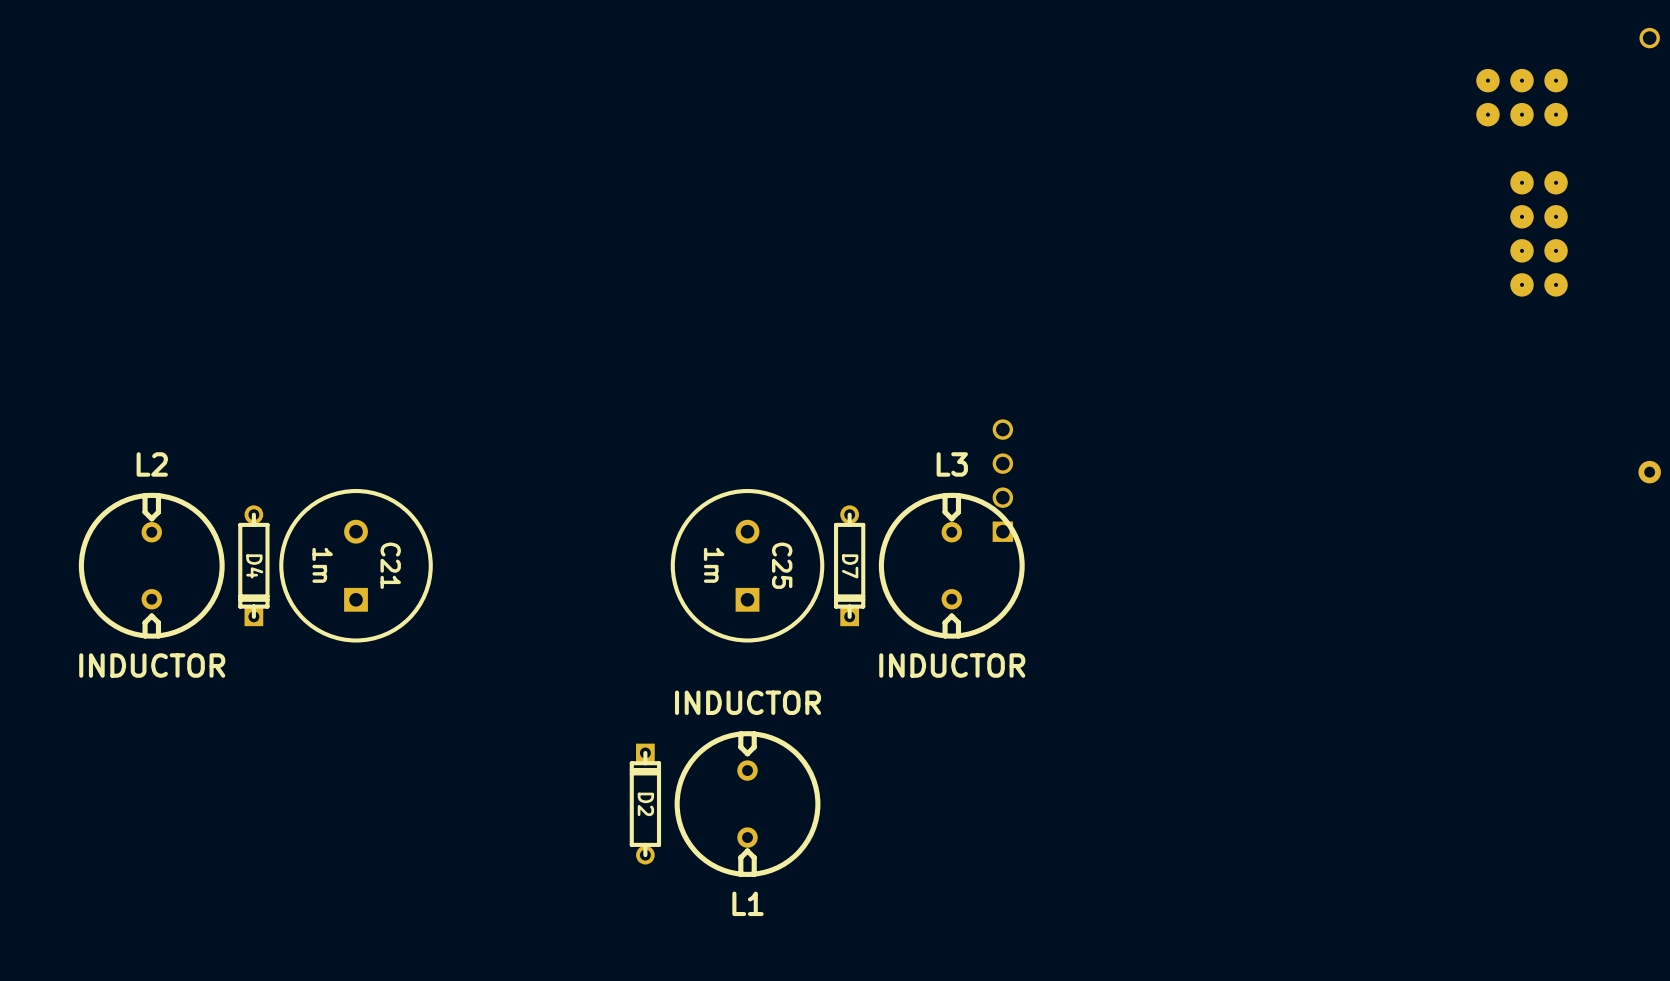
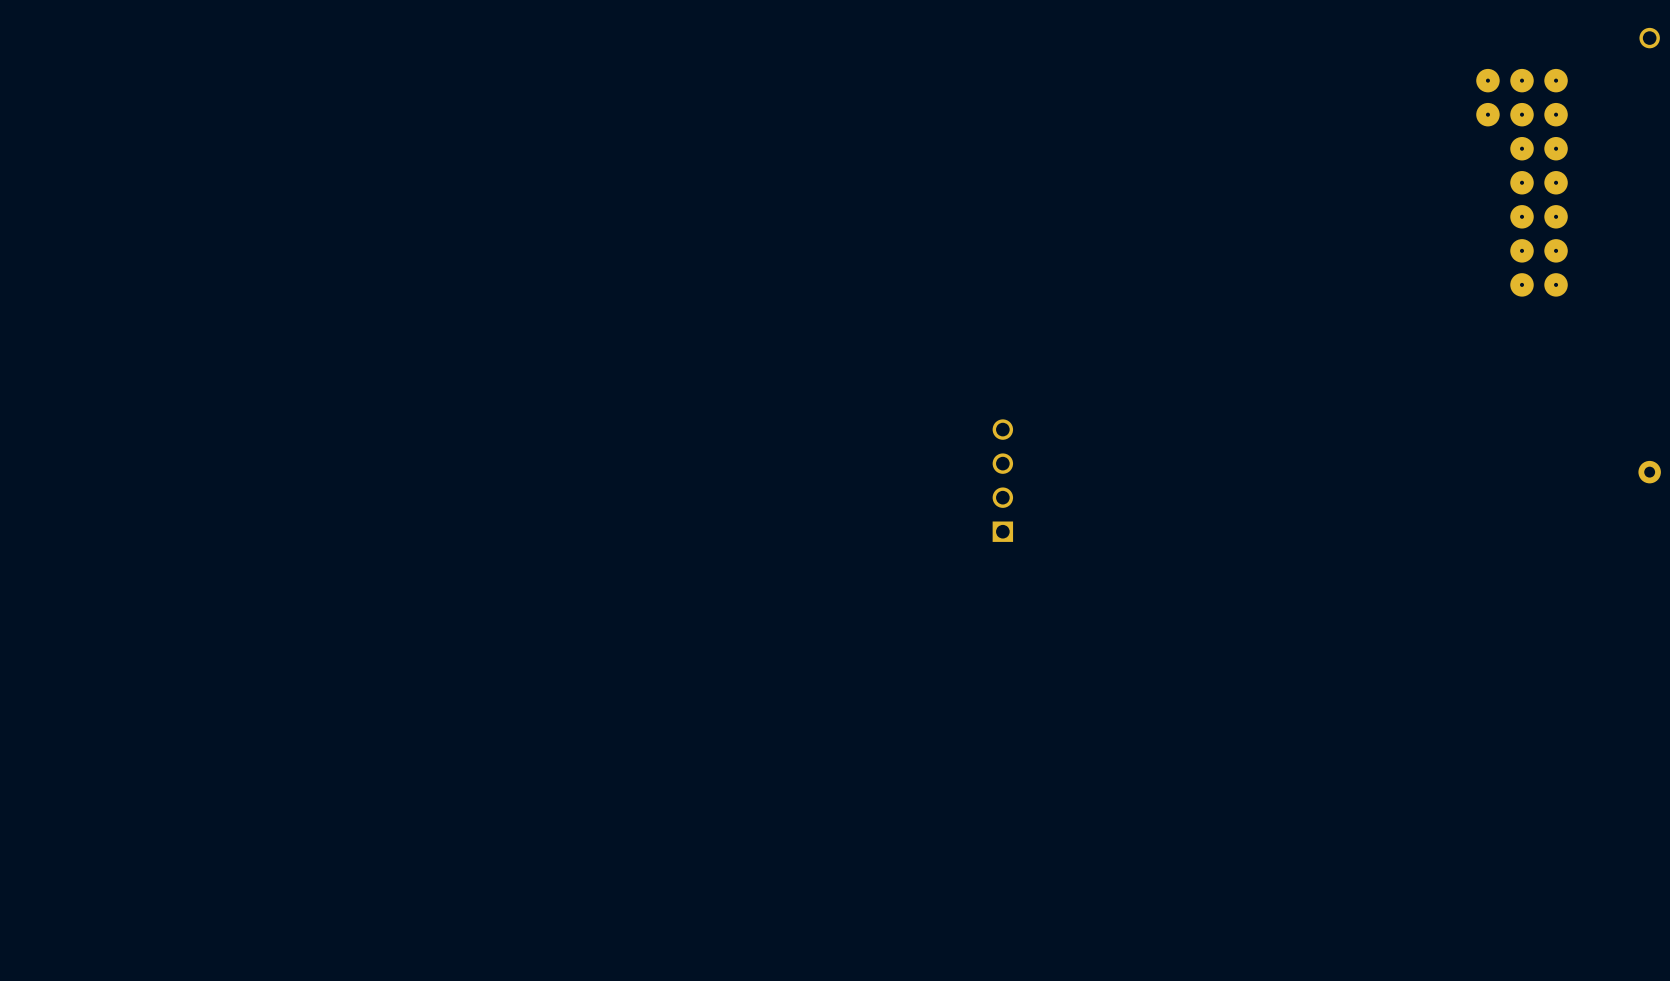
part: none -> (1539, 148)
L2: INDUCTOR (151, 565) -> none
D4: (253, 565) -> none
C21: 1m (356, 565) -> none
C25: 1m (747, 565) -> none
D7: (849, 565) -> none
L3: INDUCTOR (951, 565) -> none
D2: (645, 804) -> none
L1: INDUCTOR (747, 804) -> none

